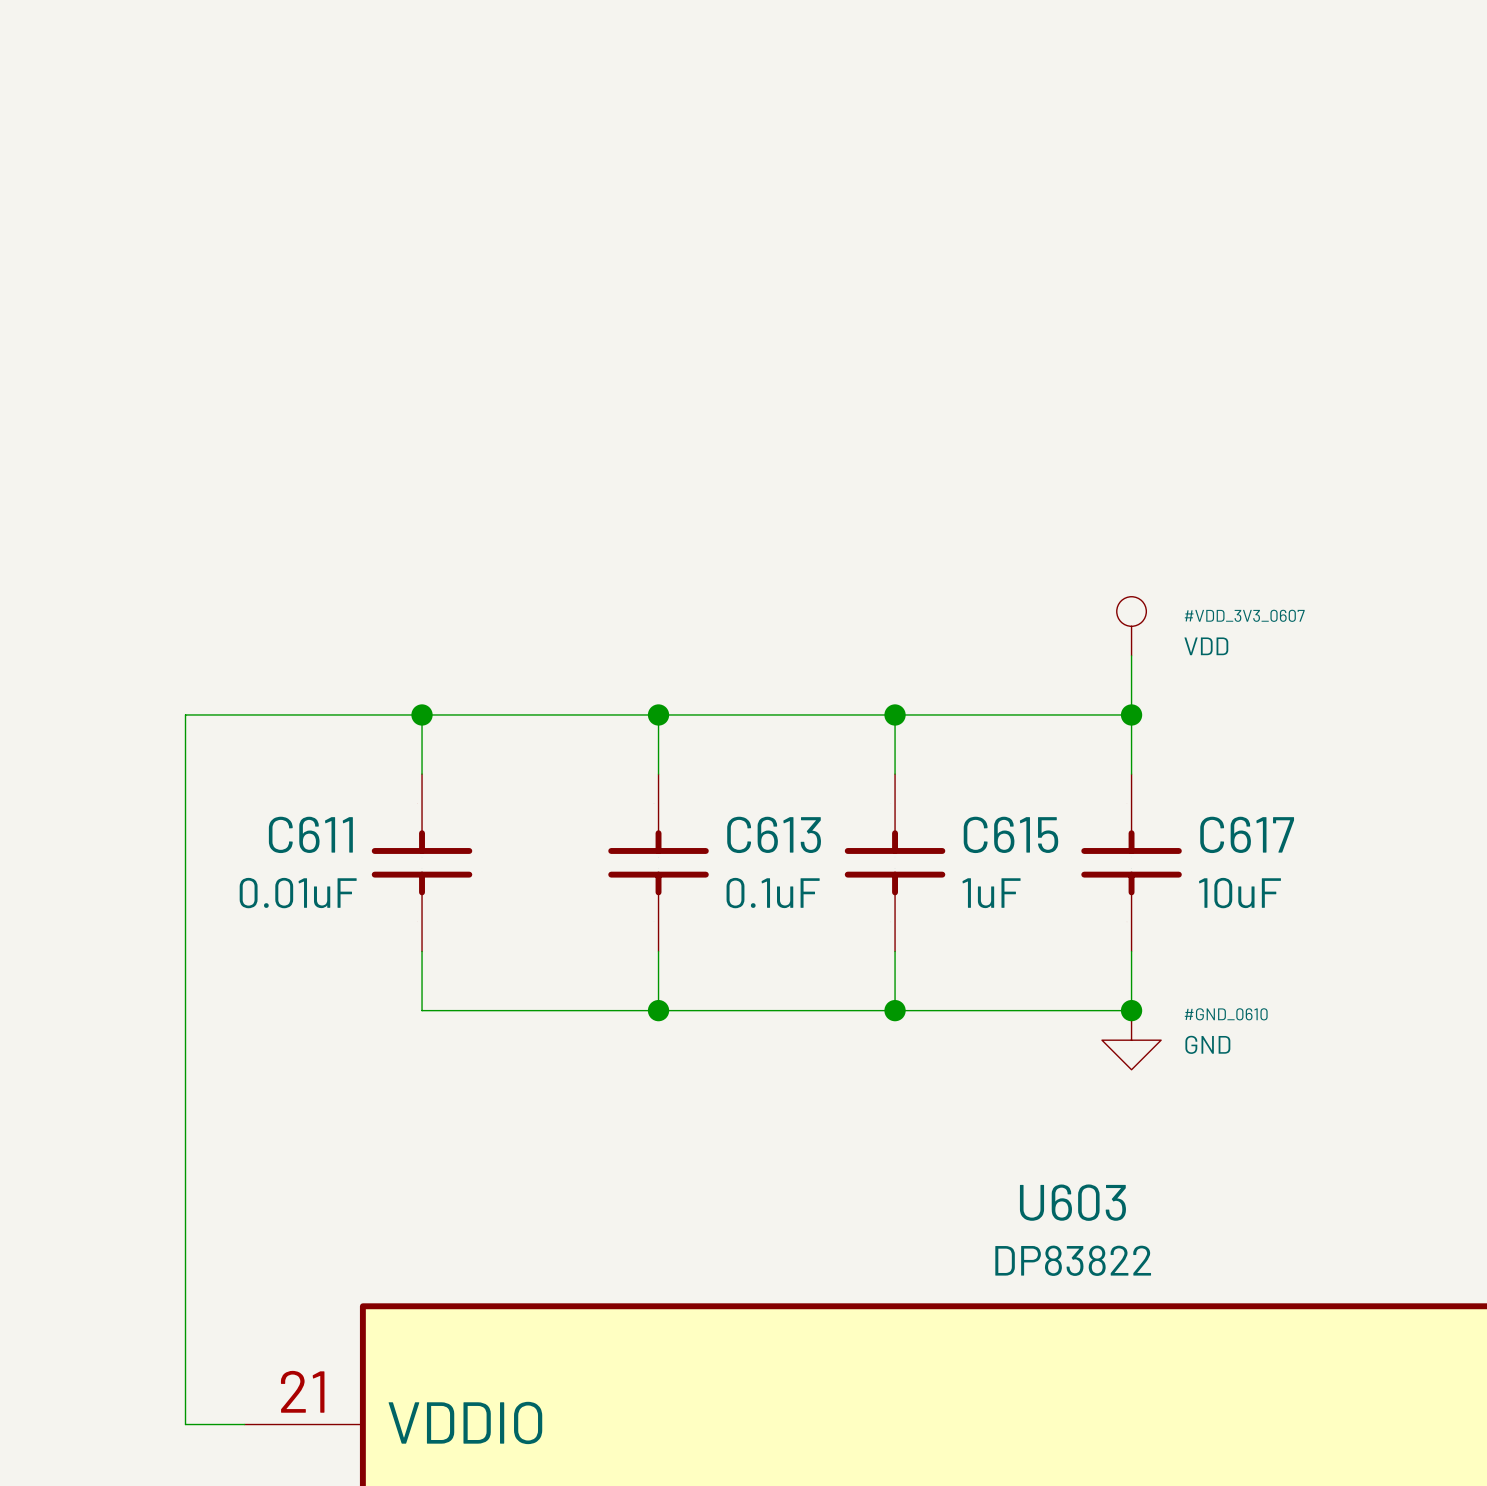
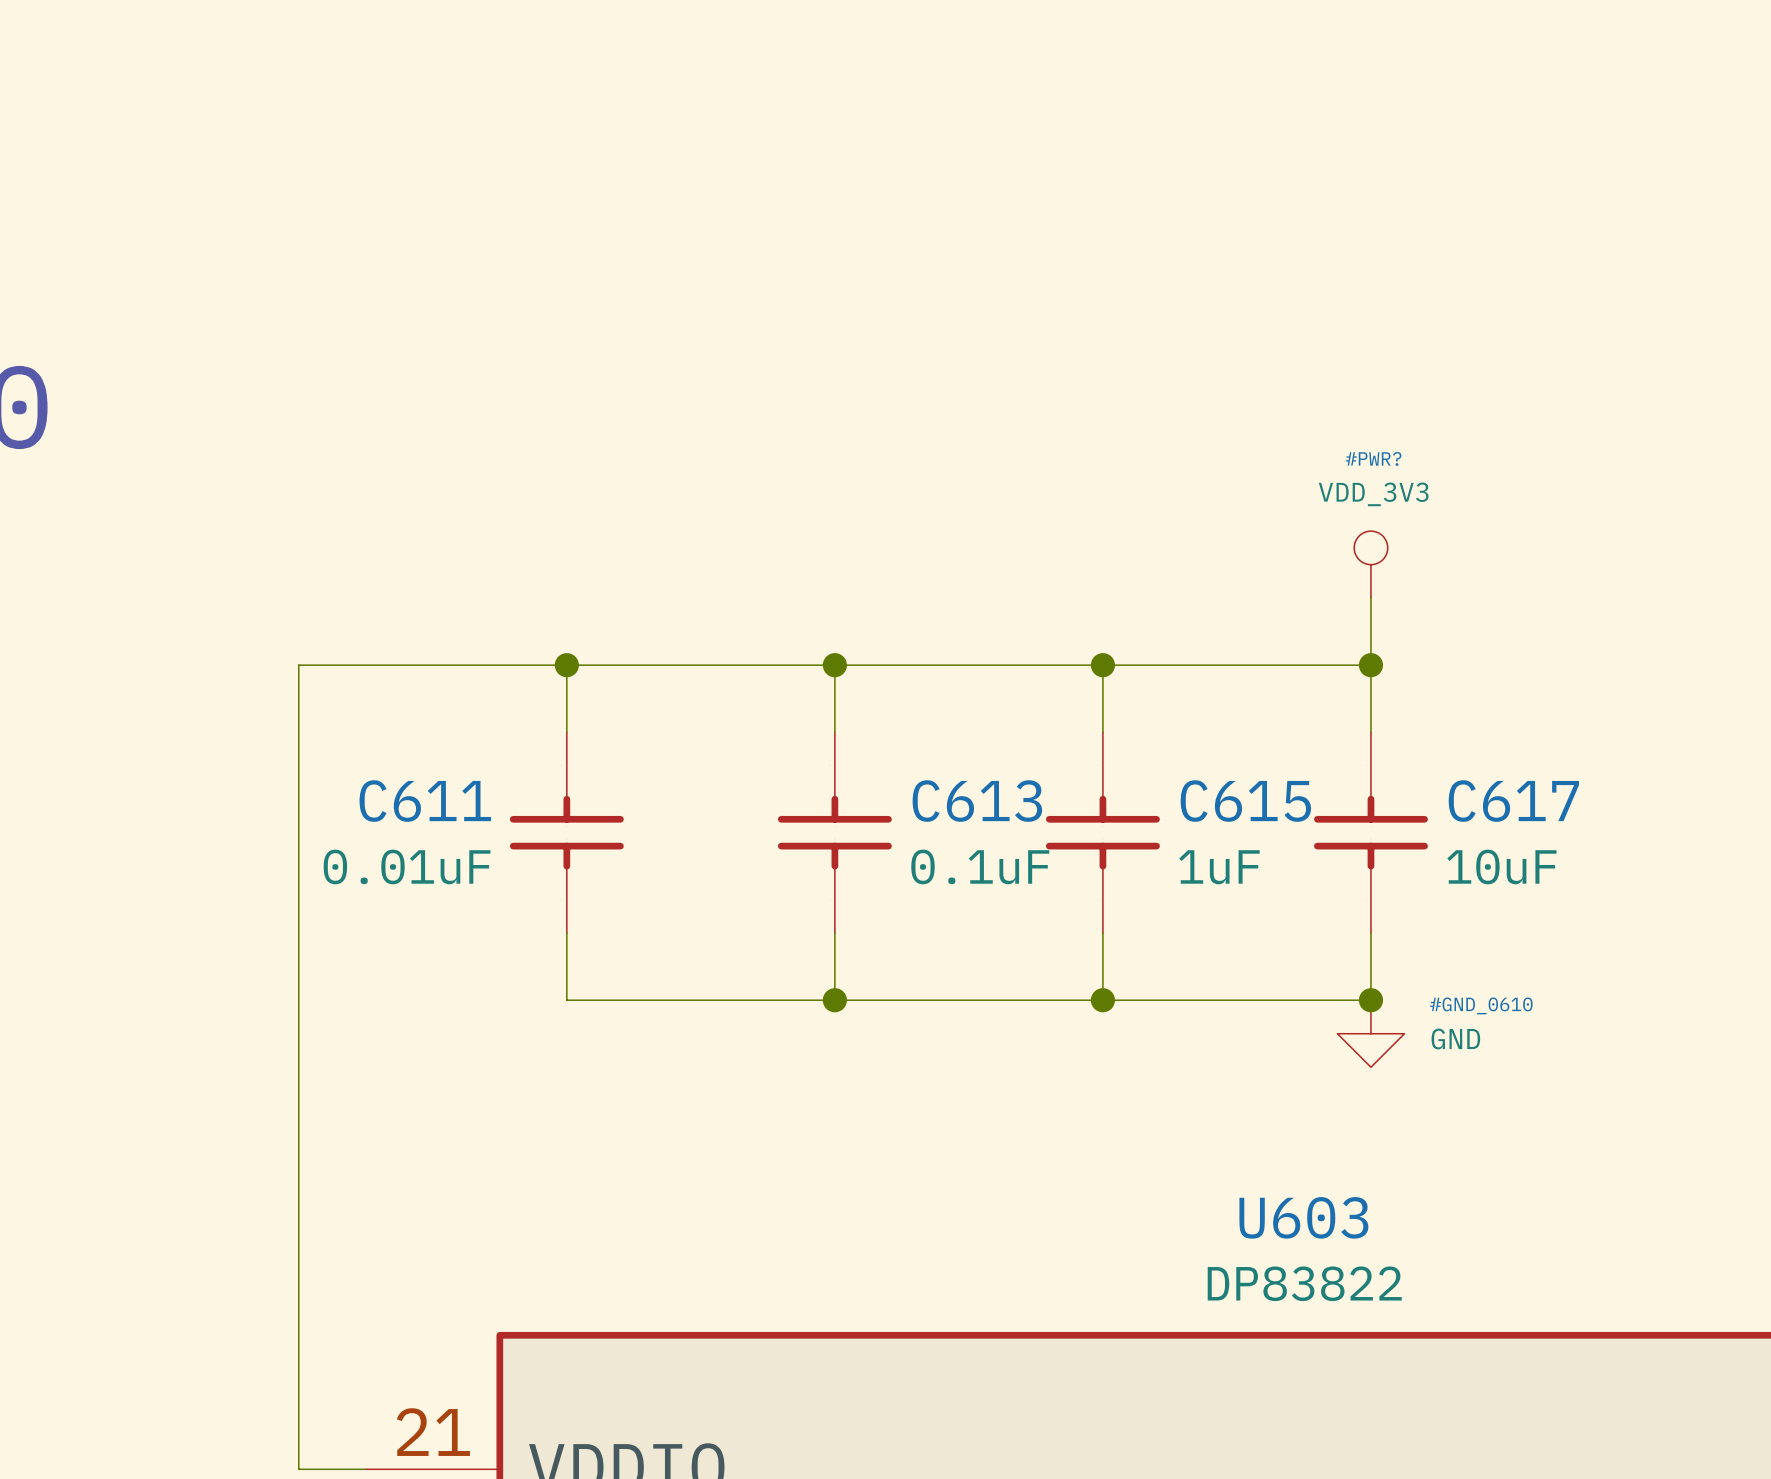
power symbol: VDD (1131, 626) -> VDD_3V3 (1370, 564)

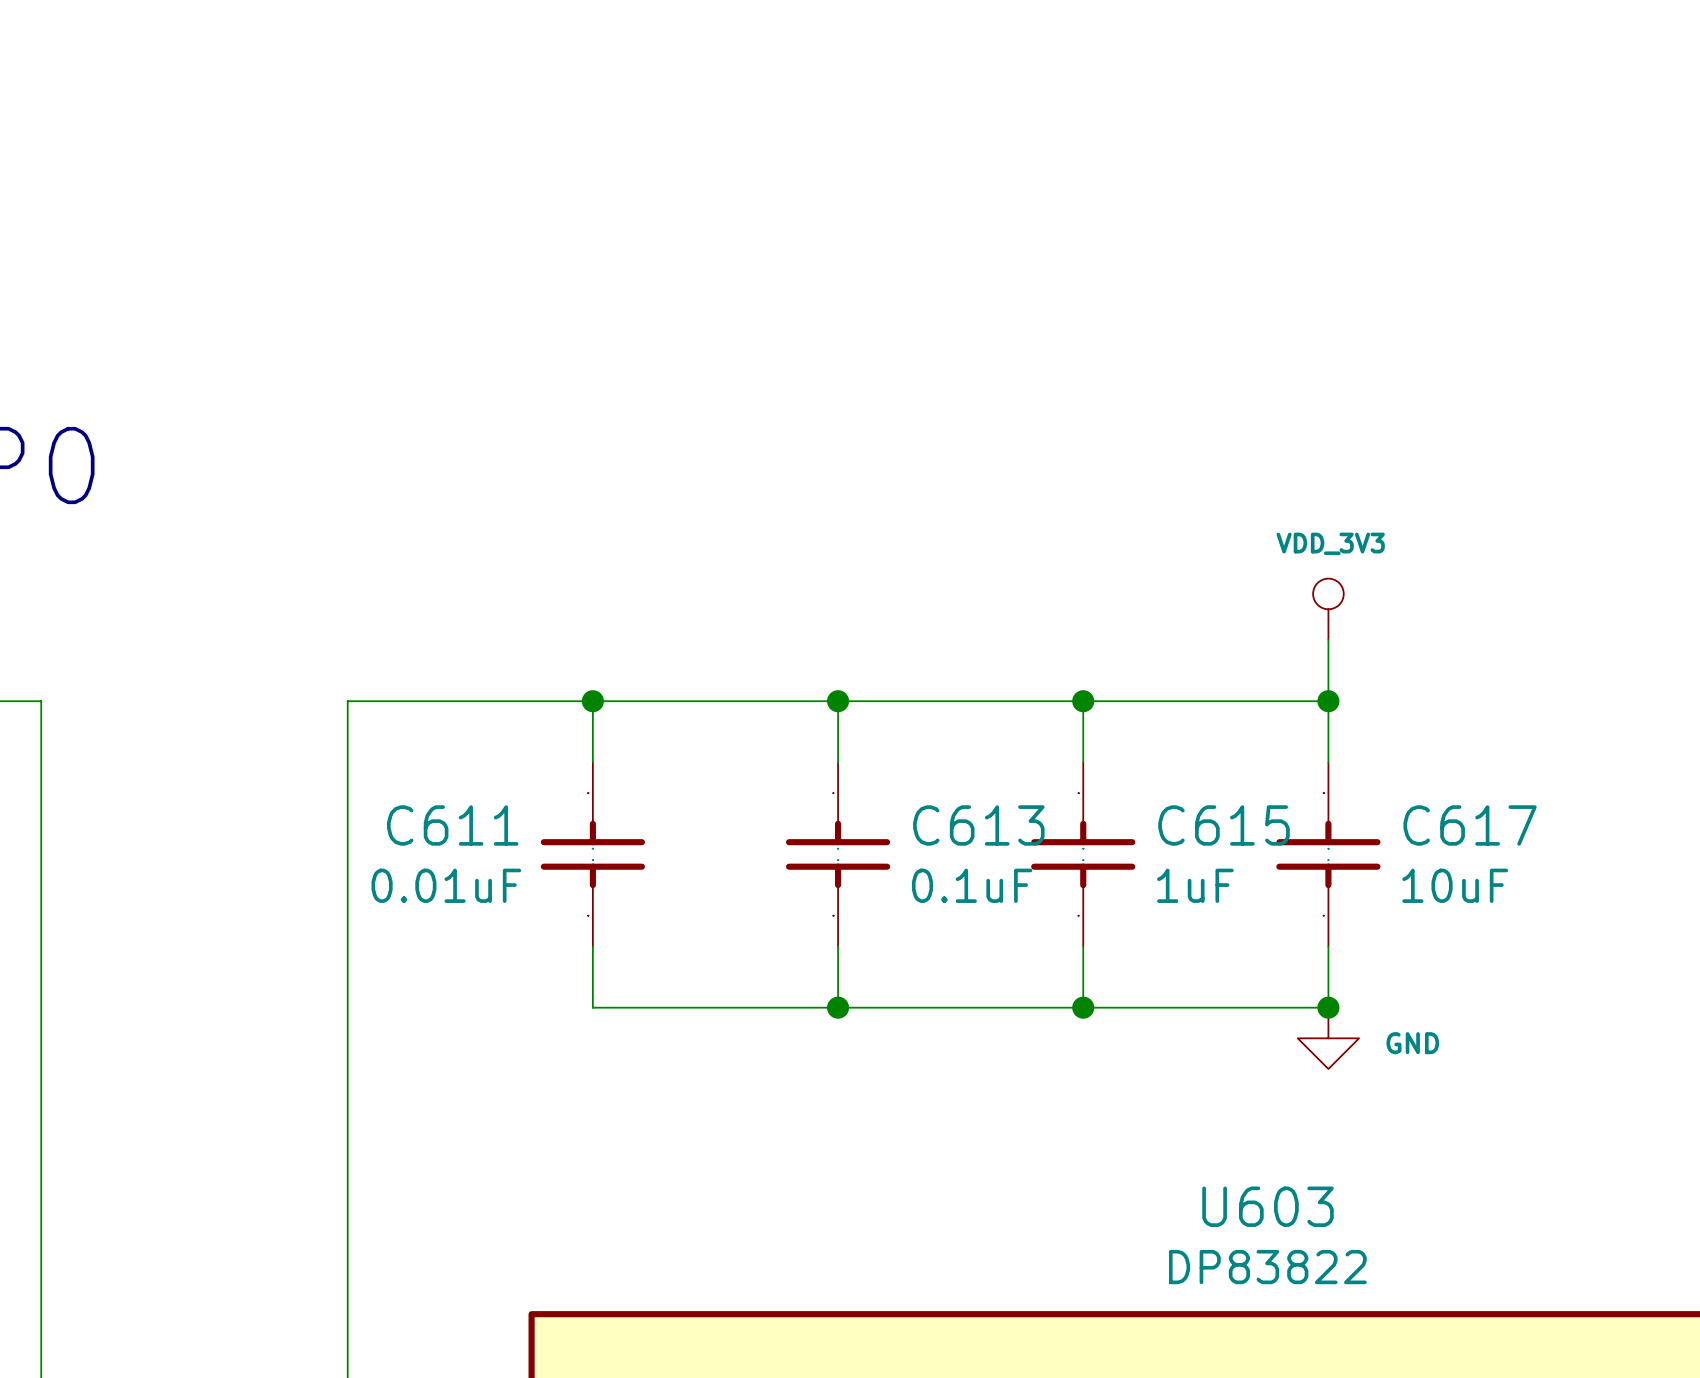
#PWR? name: #PWR? (1373, 458) -> none
#GND_0610 name: #GND_0610 (1481, 1005) -> none

